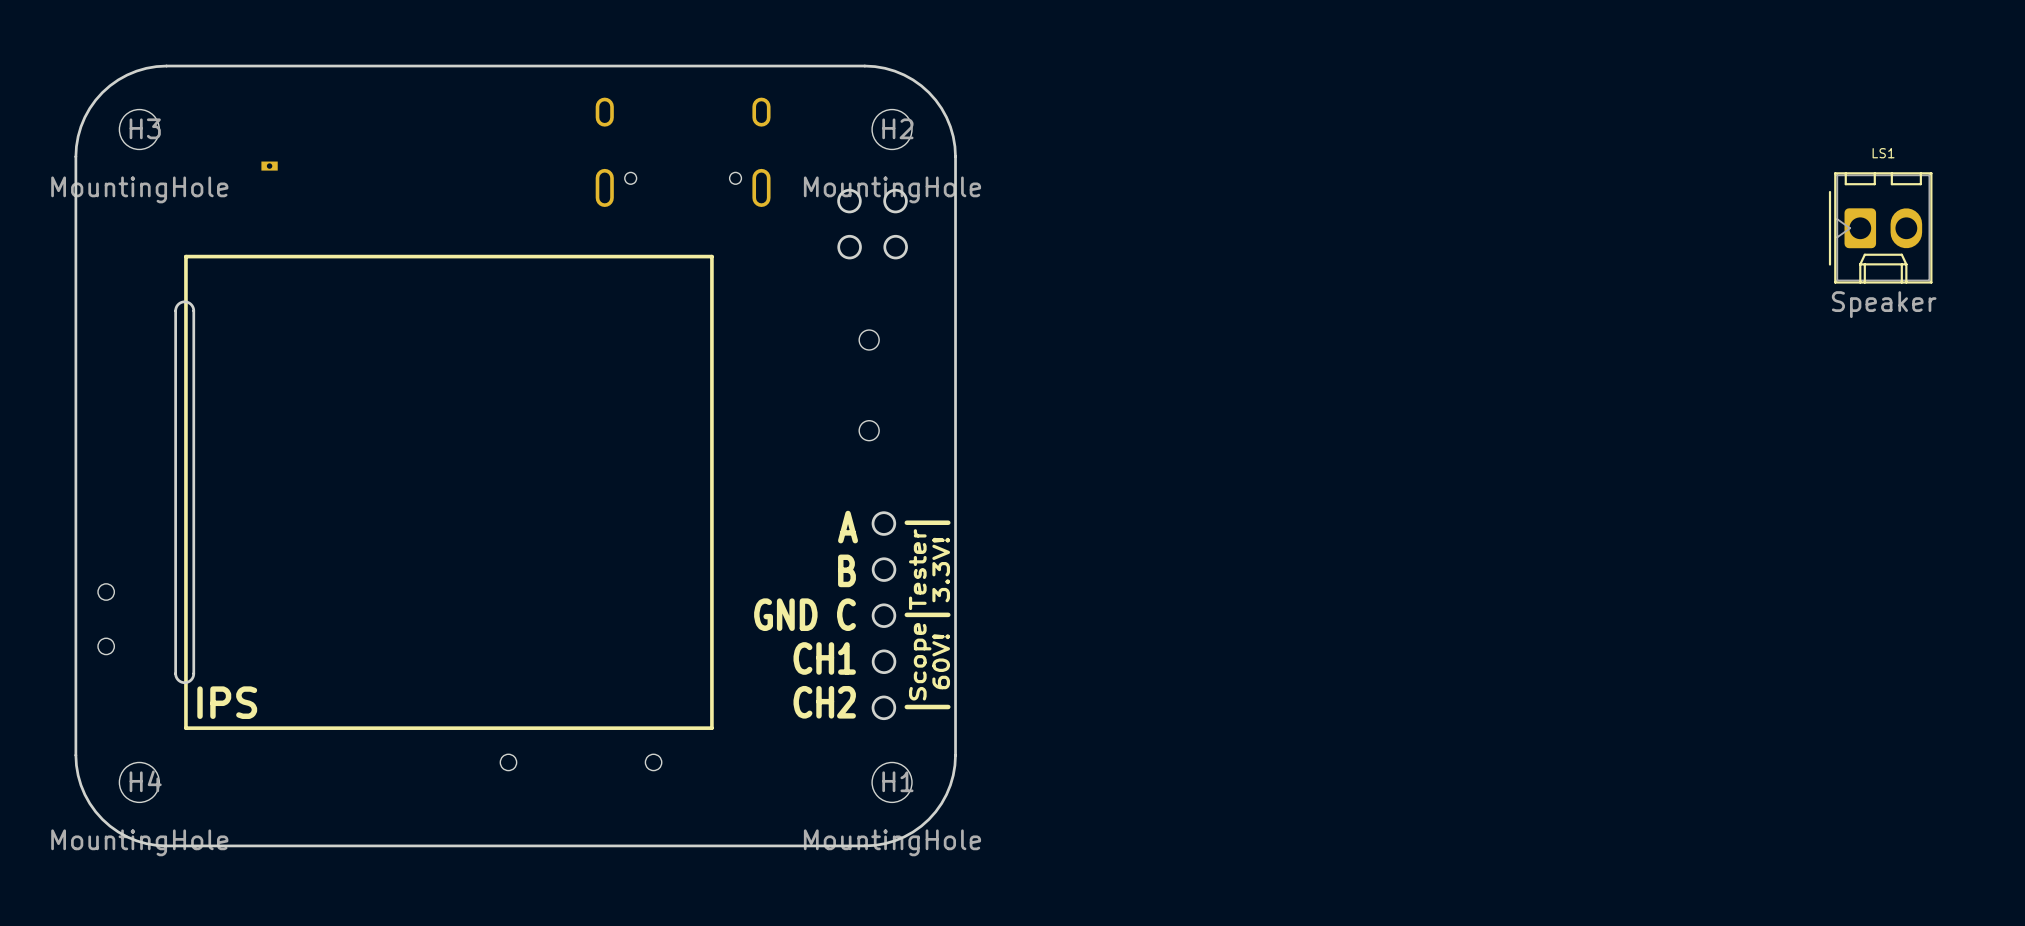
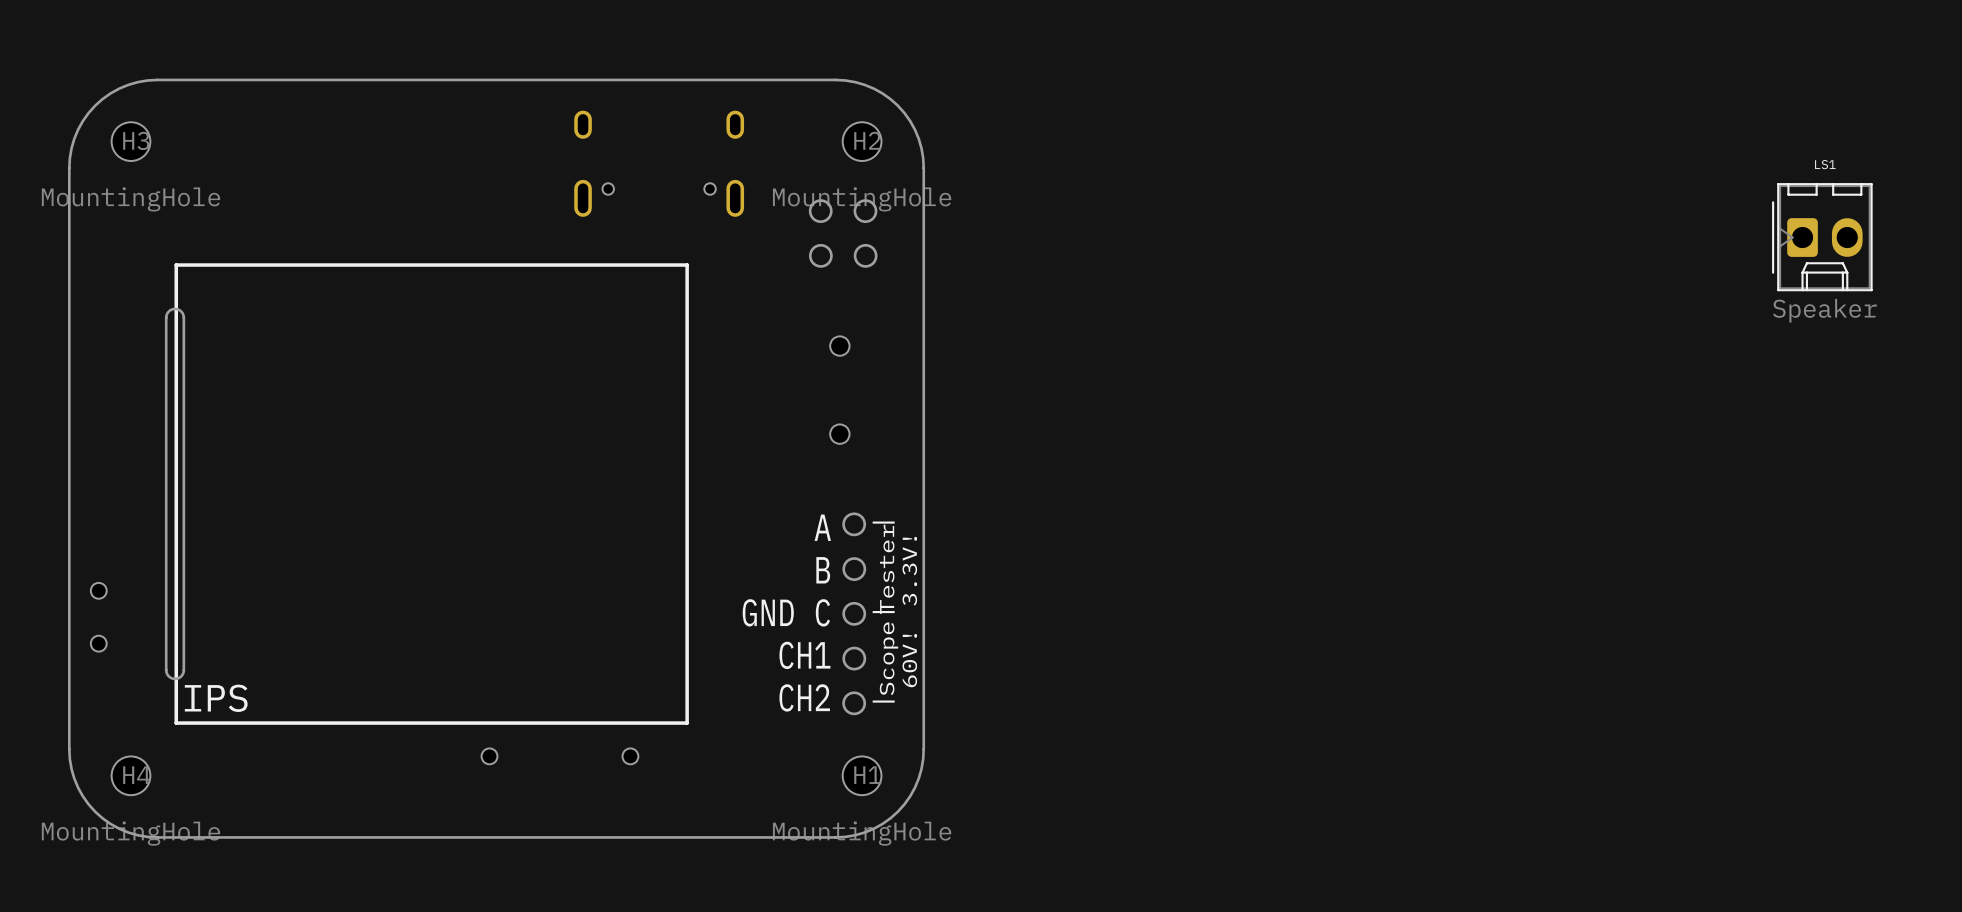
part: (269, 166) -> none

